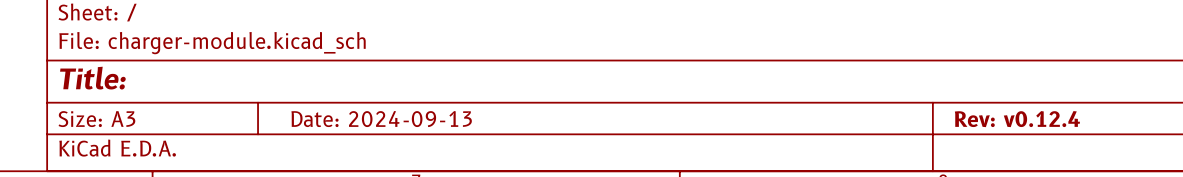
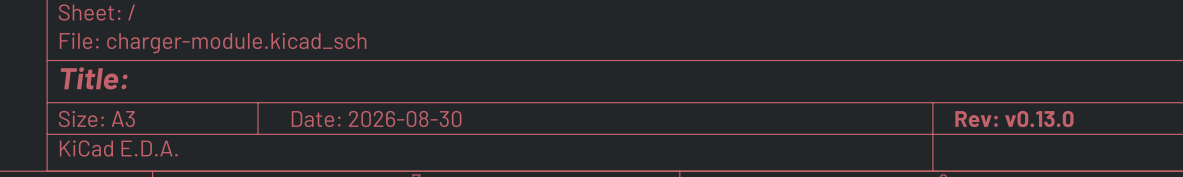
title block: Date: 2024-09-13 (381, 119) -> Date: 2026-08-30 (376, 118)
title block: Rev: v0.12.4 (1017, 119) -> Rev: v0.13.0 (1014, 119)

